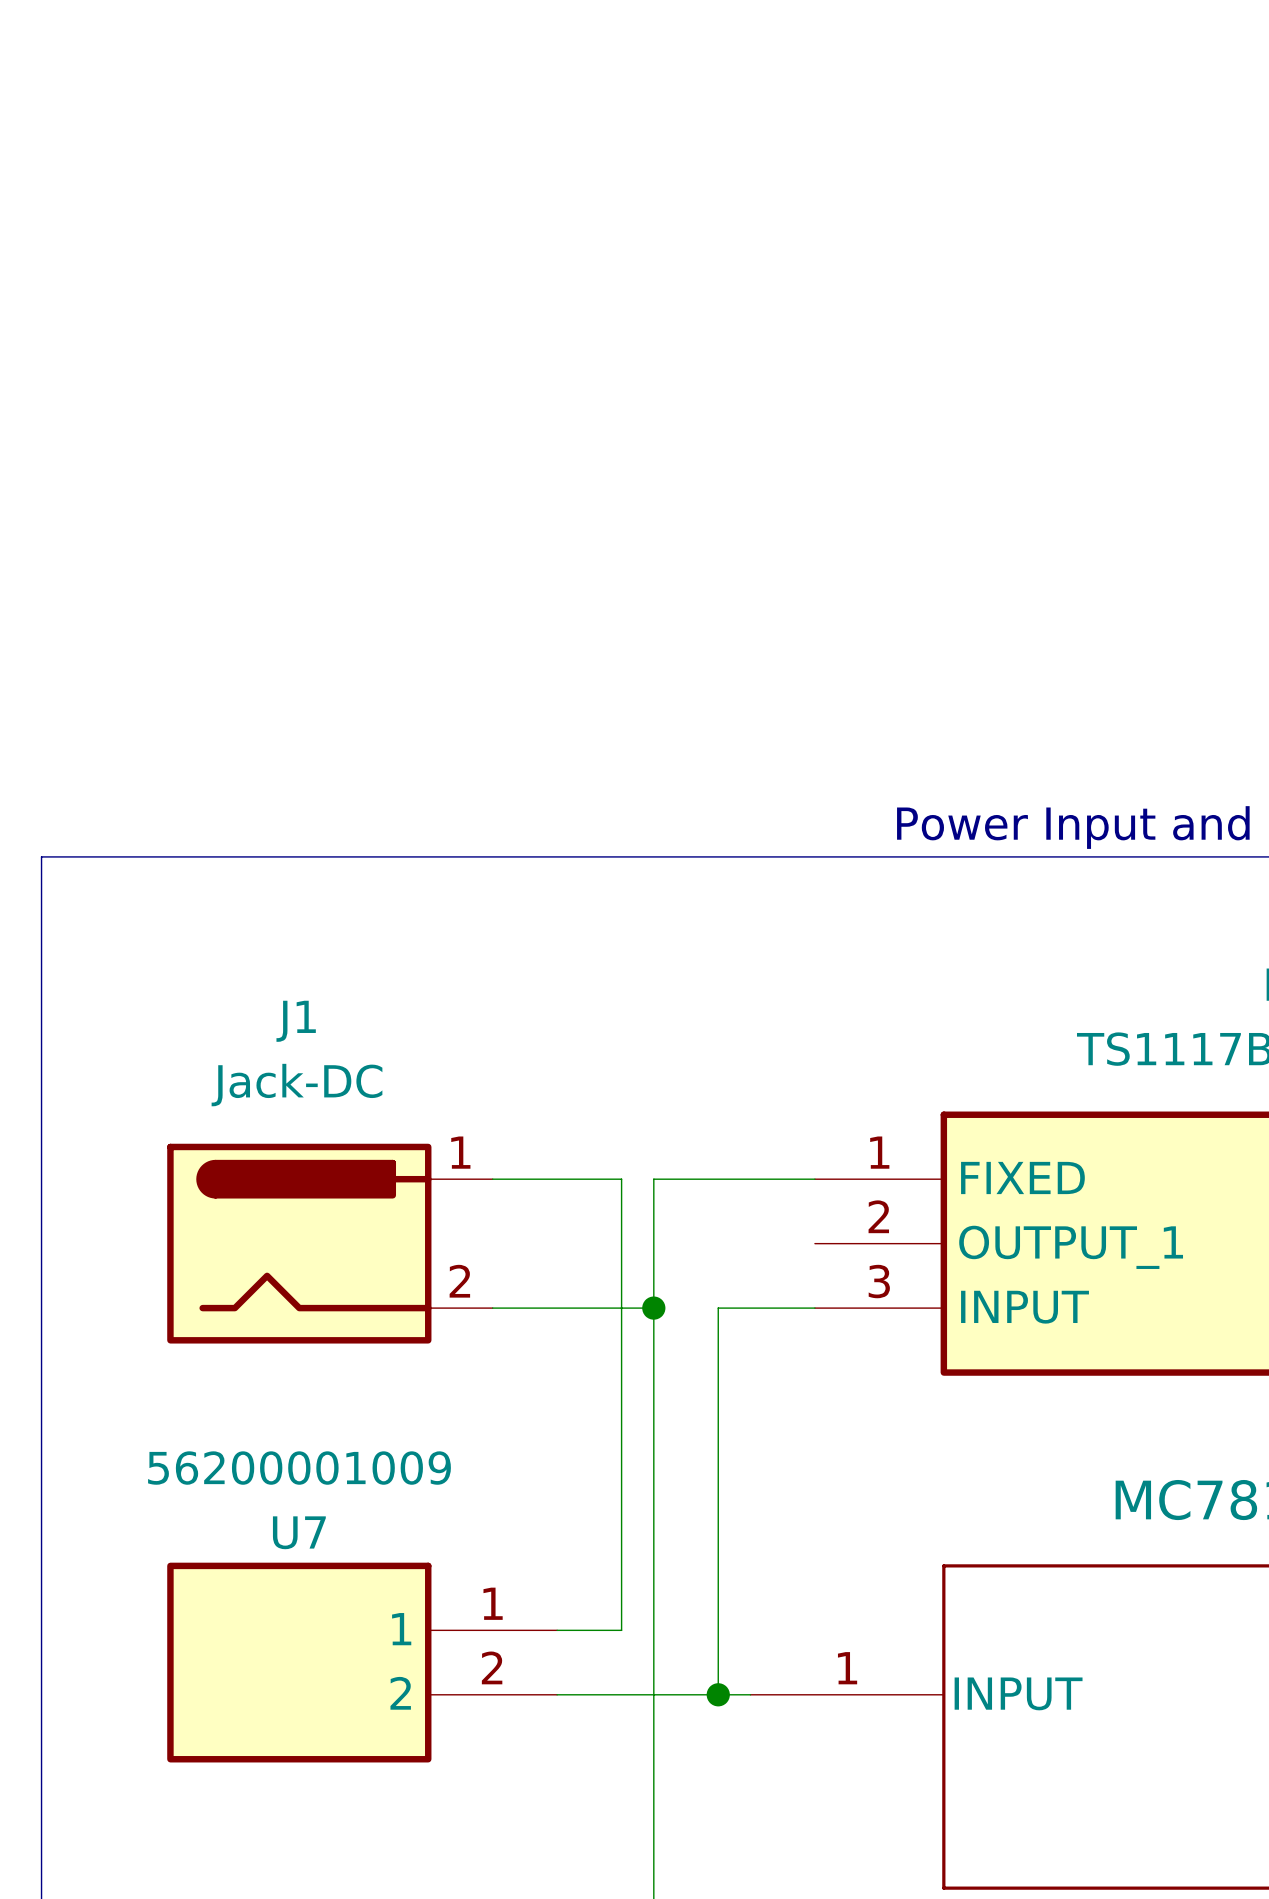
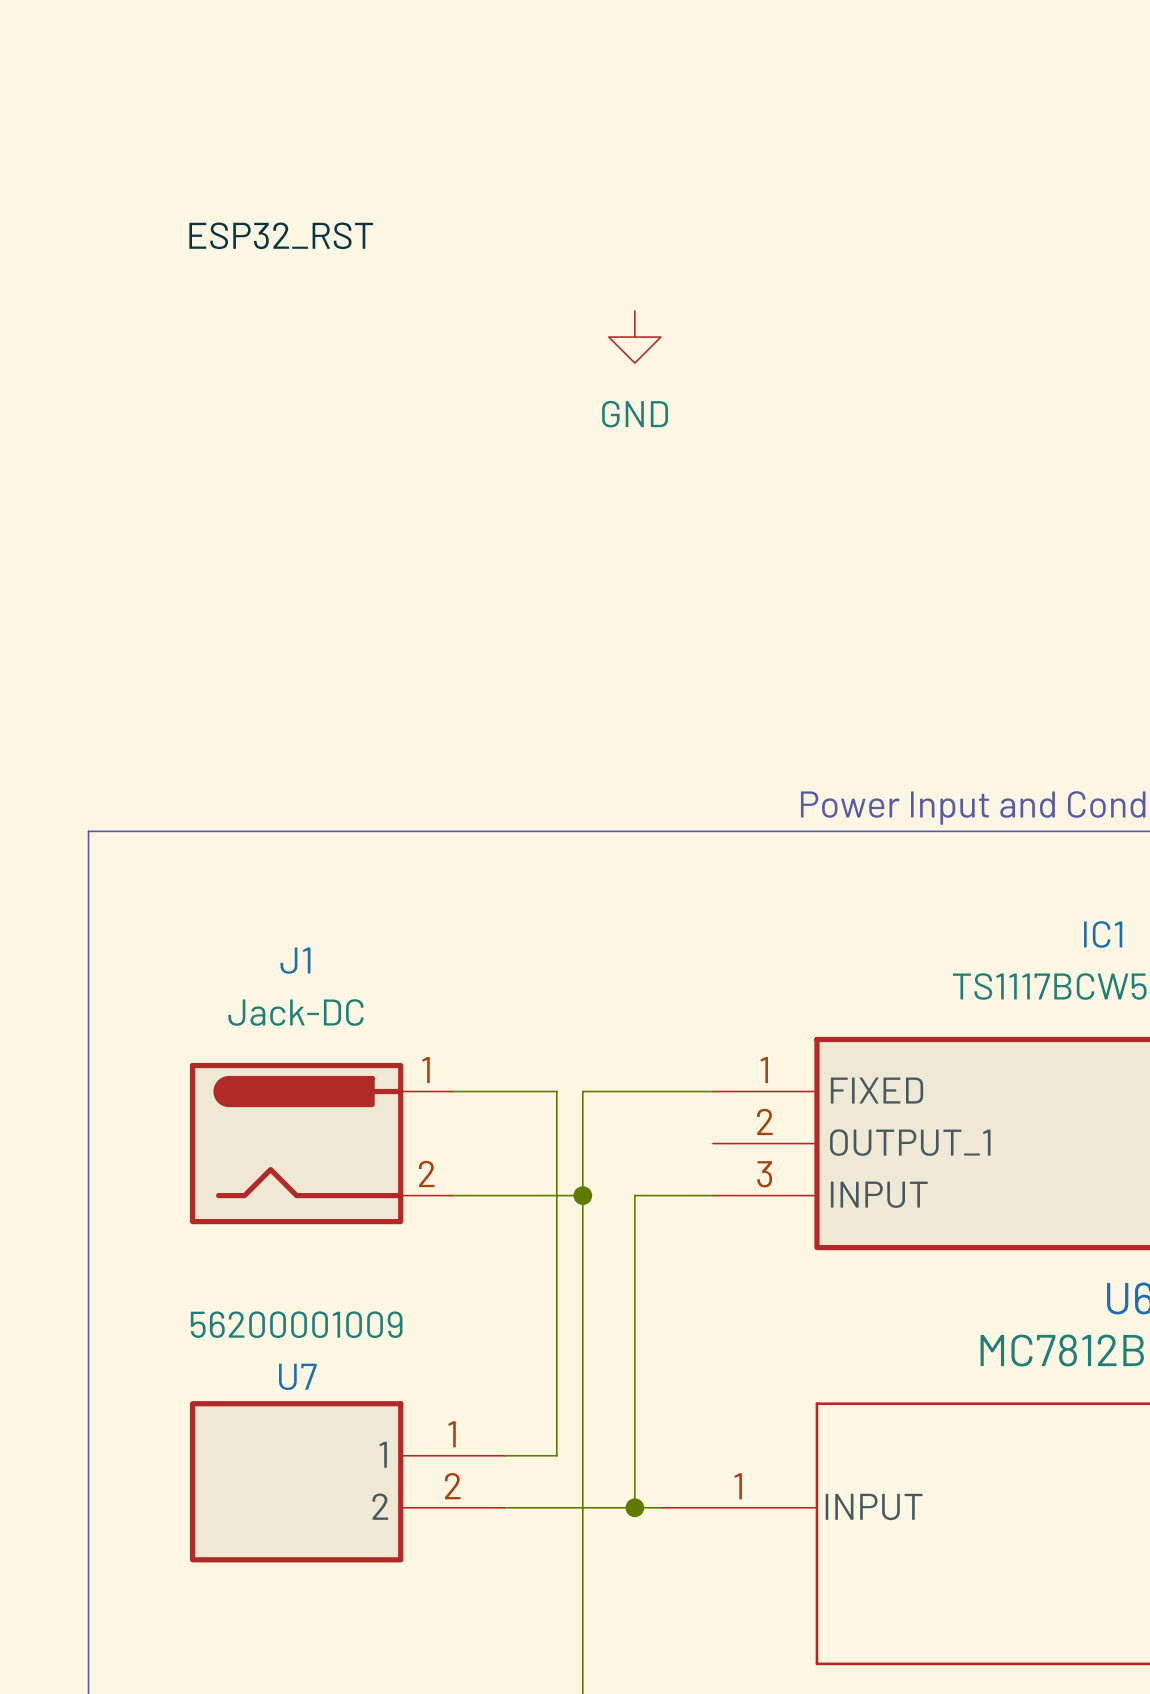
label: none -> ESP32_RST (281, 235)
power symbol: none -> GND (634, 337)

